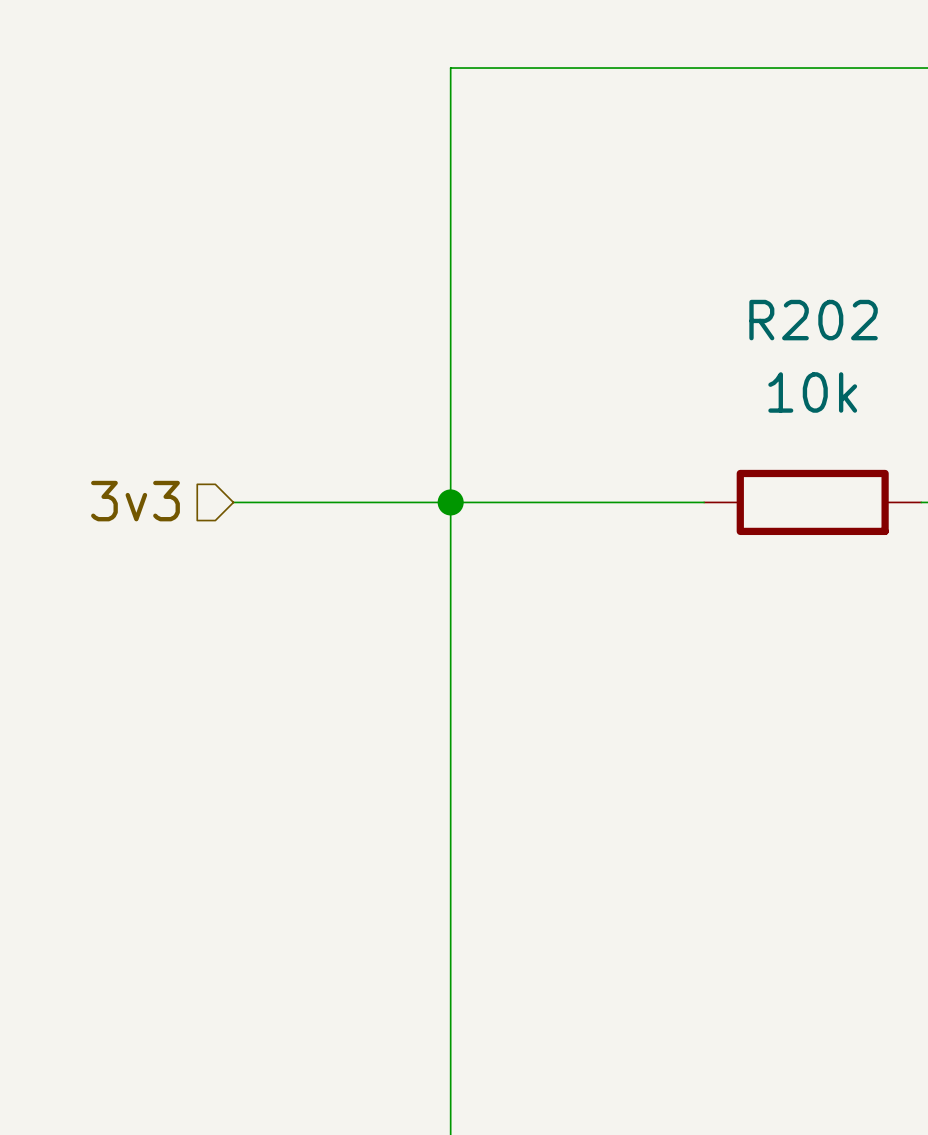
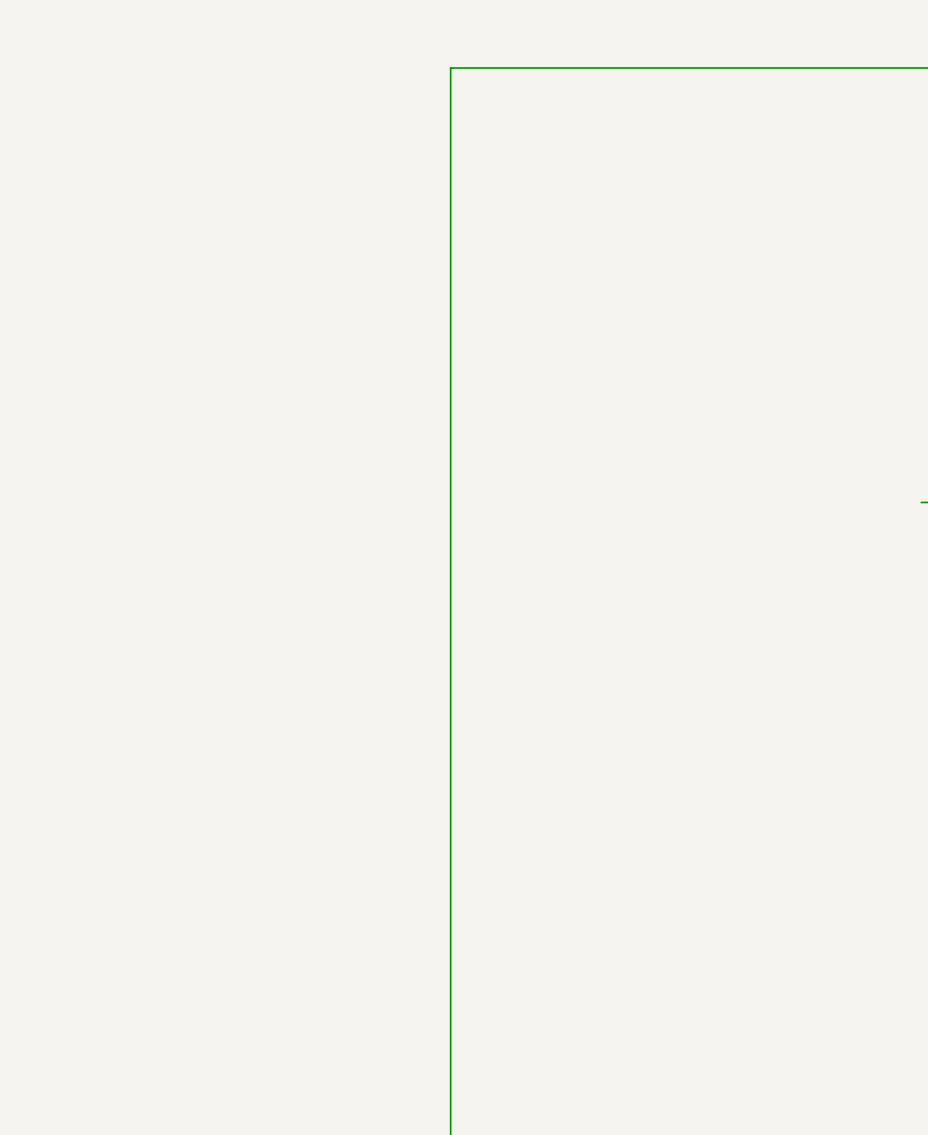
hierarchical label: 3v3 (135, 501) -> none
wire: (233, 502) (704, 502) -> none
junction: (450, 502) -> none
R202: 10k (812, 502) -> none

